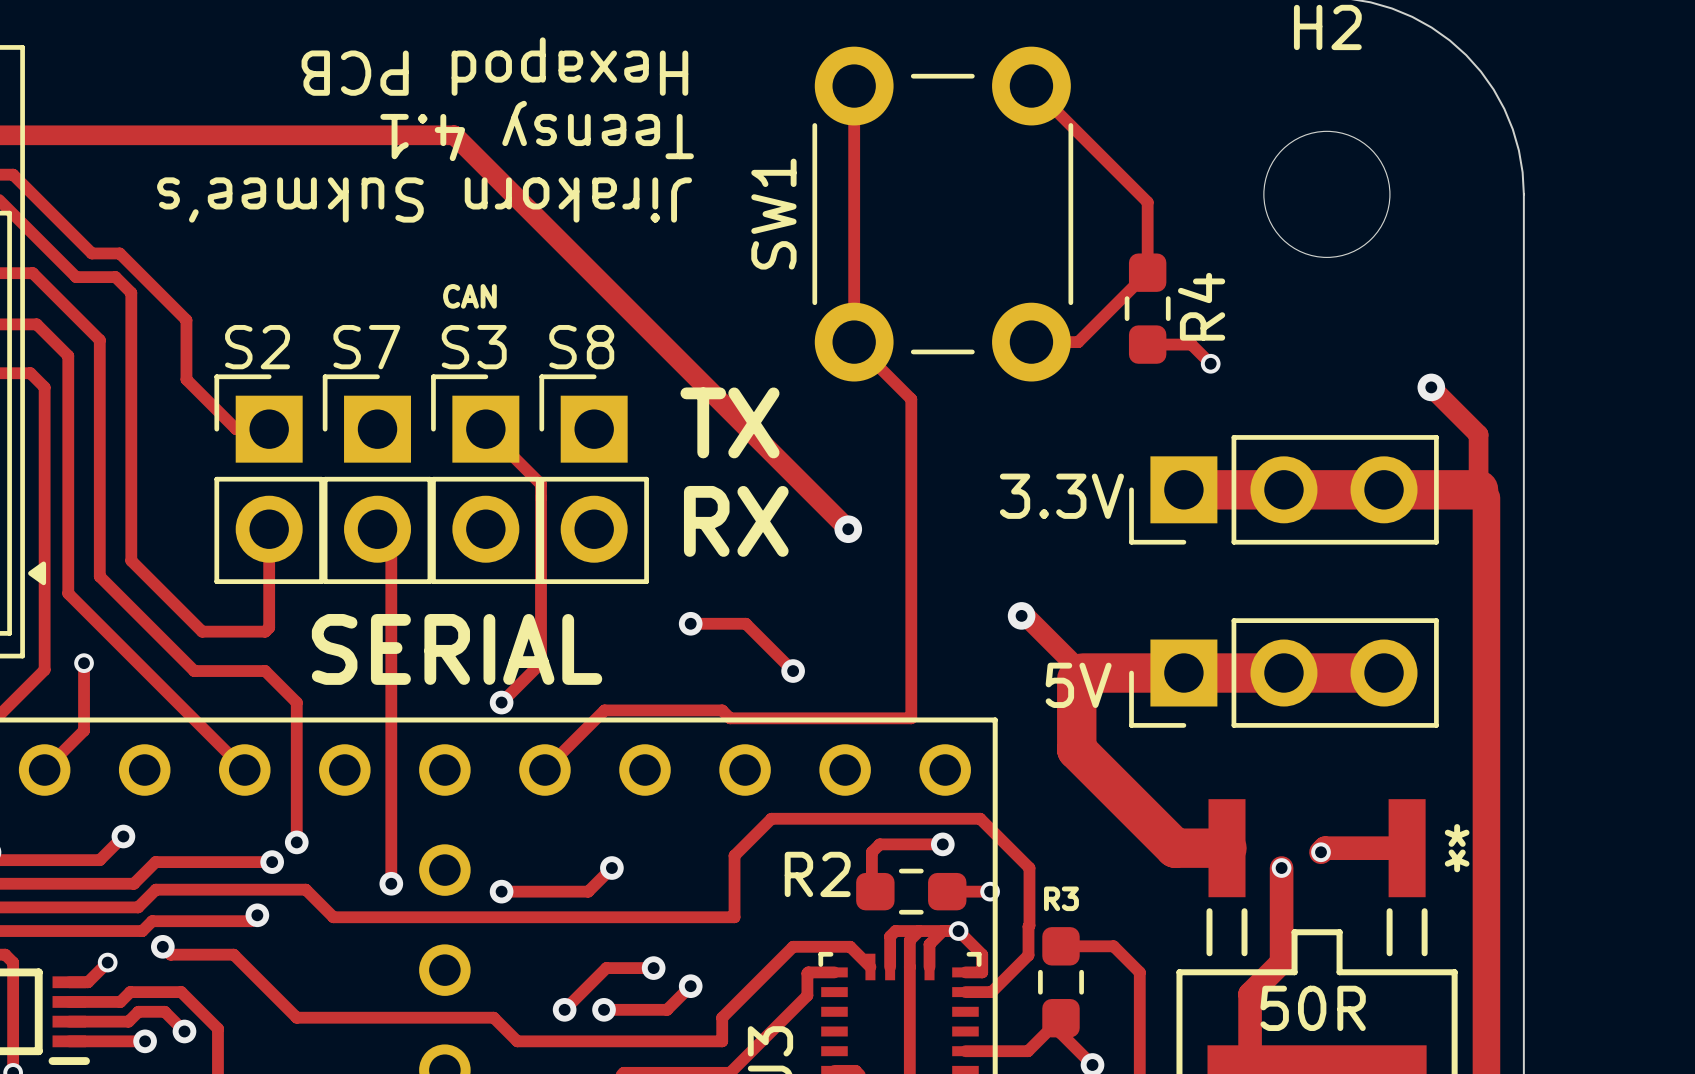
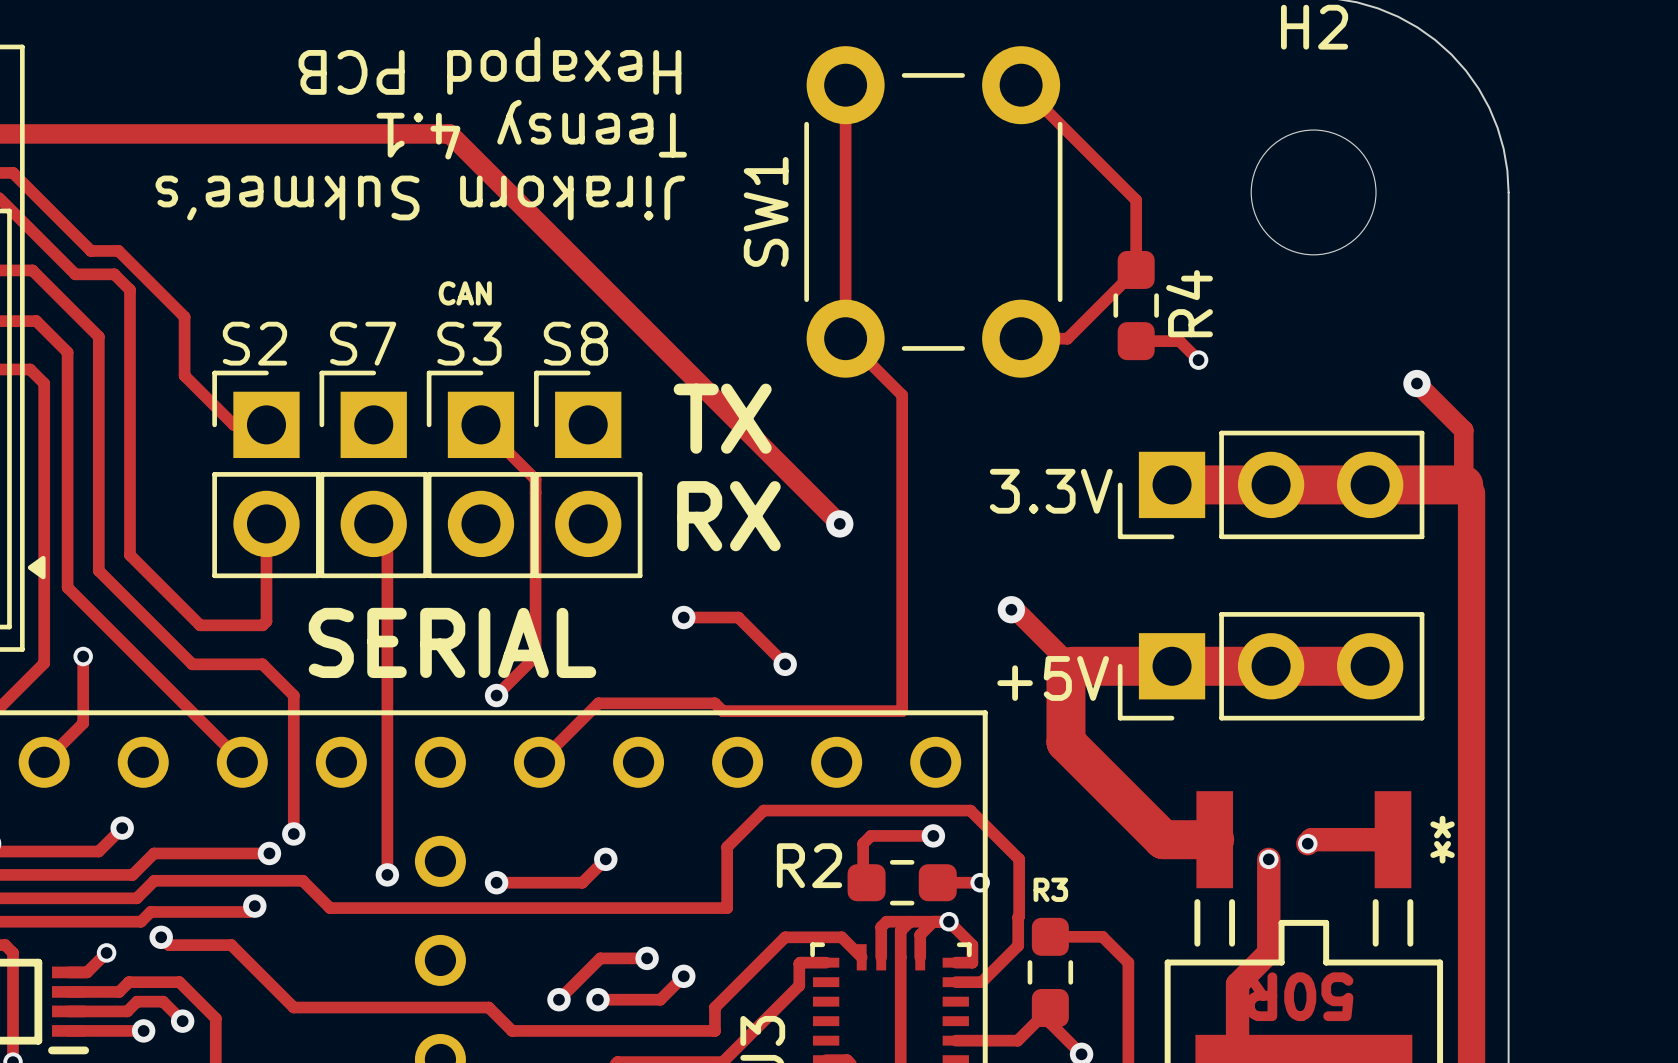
5V name: 5V (1078, 685) -> +5V (1053, 678)
text: none -> 50R (1299, 996)
50R name: 50R (1313, 1008) -> none

